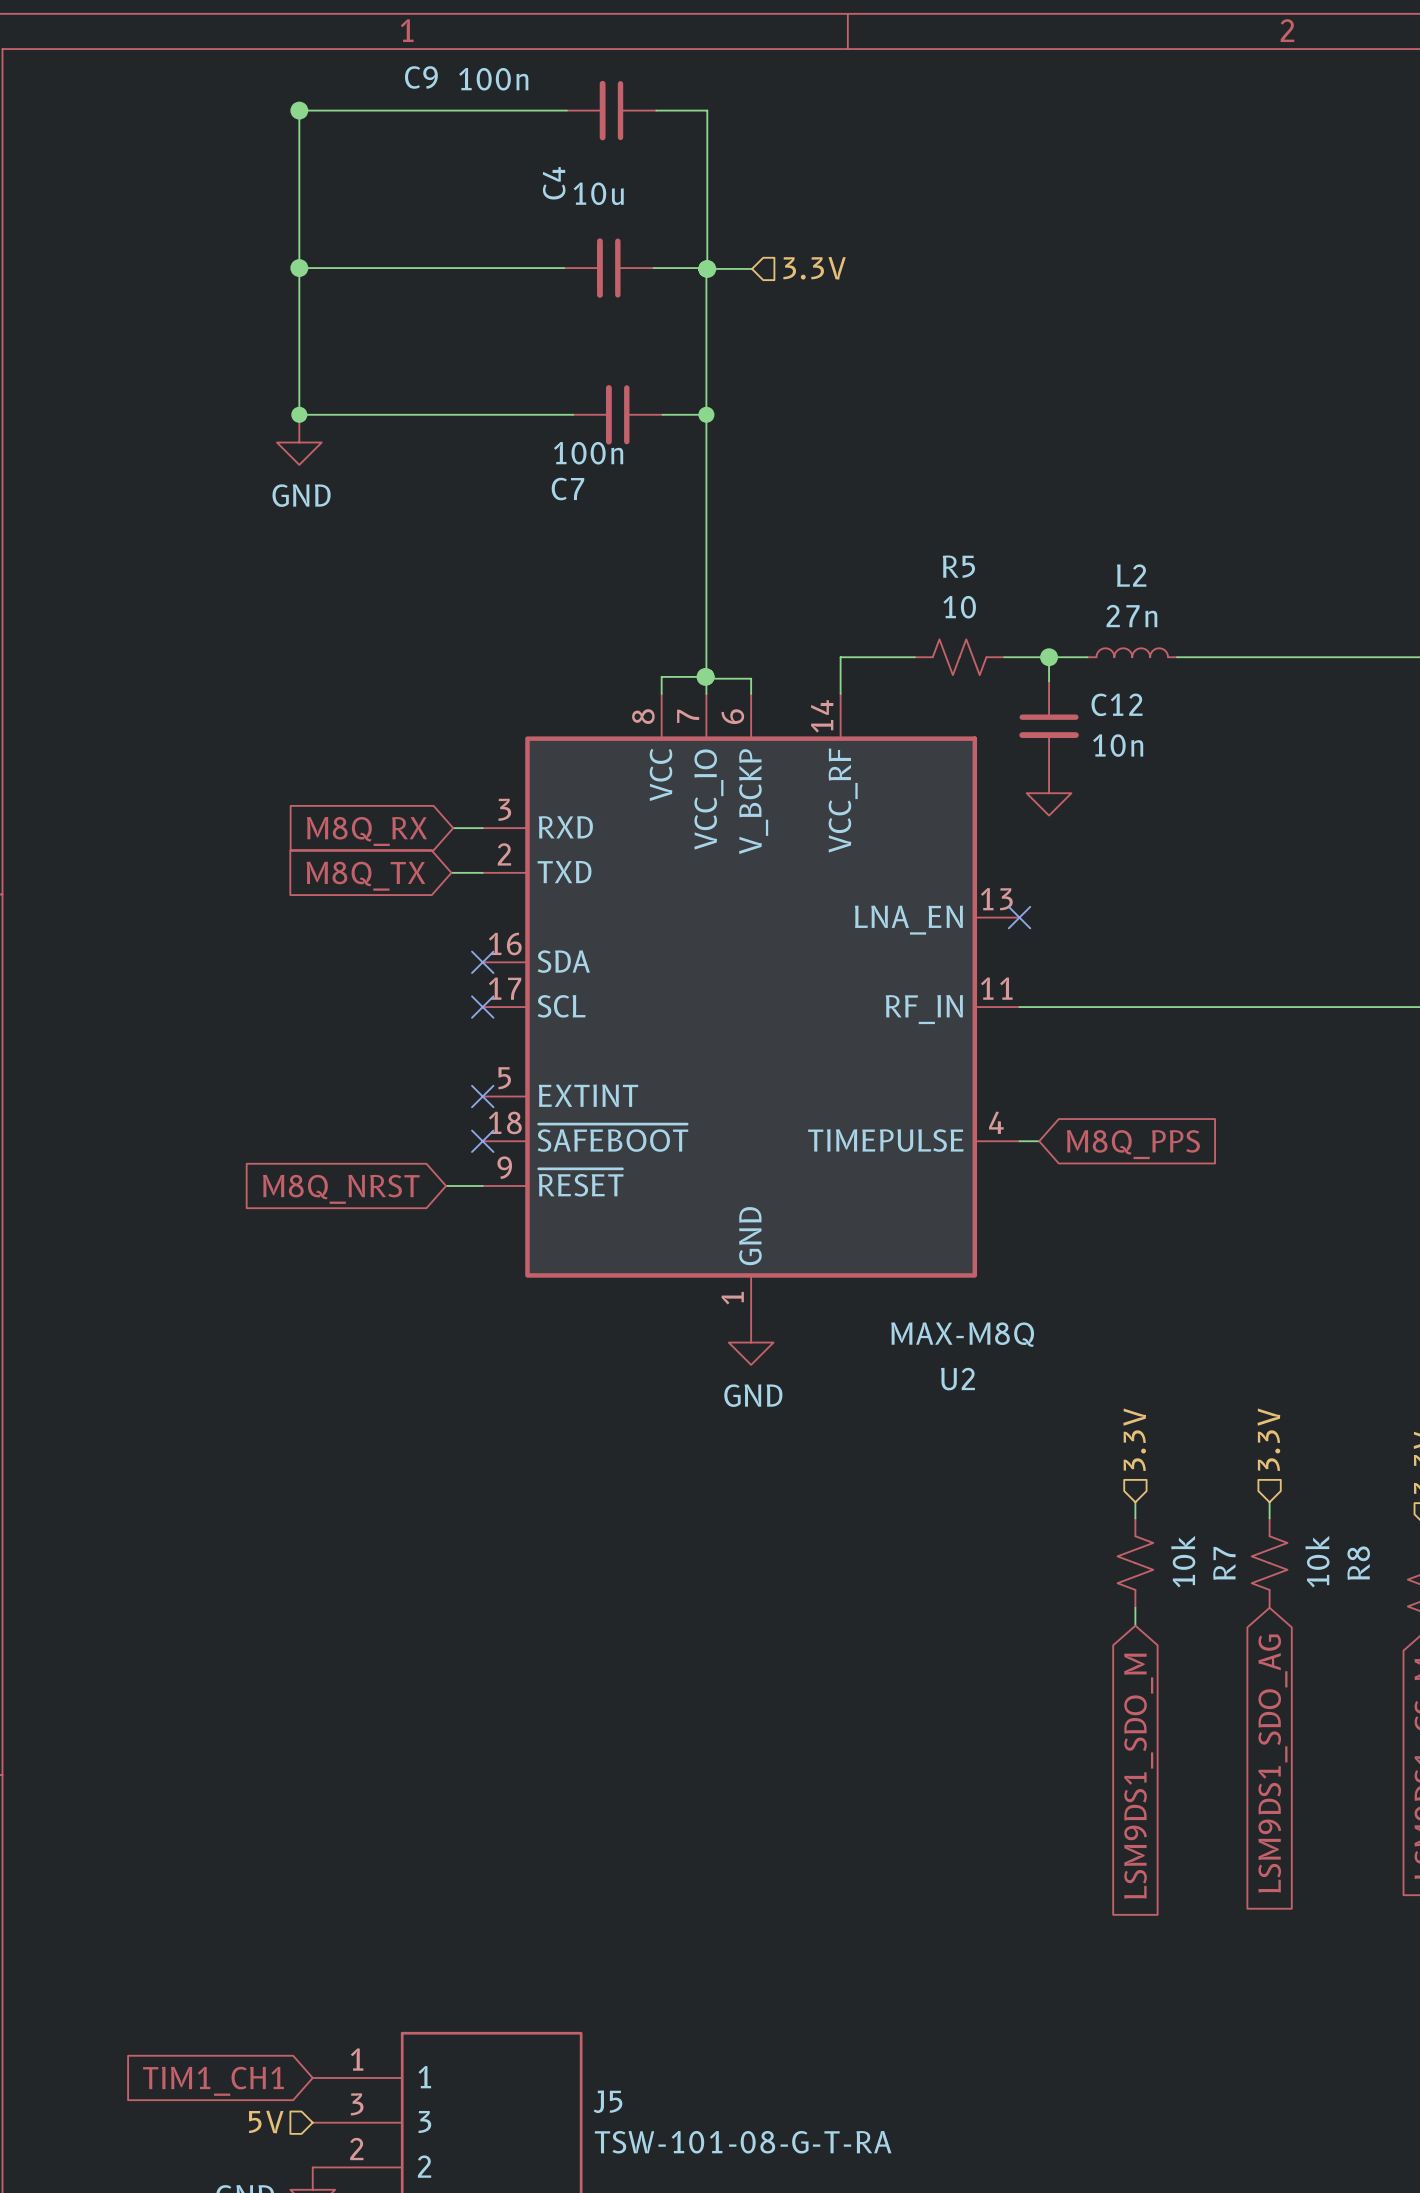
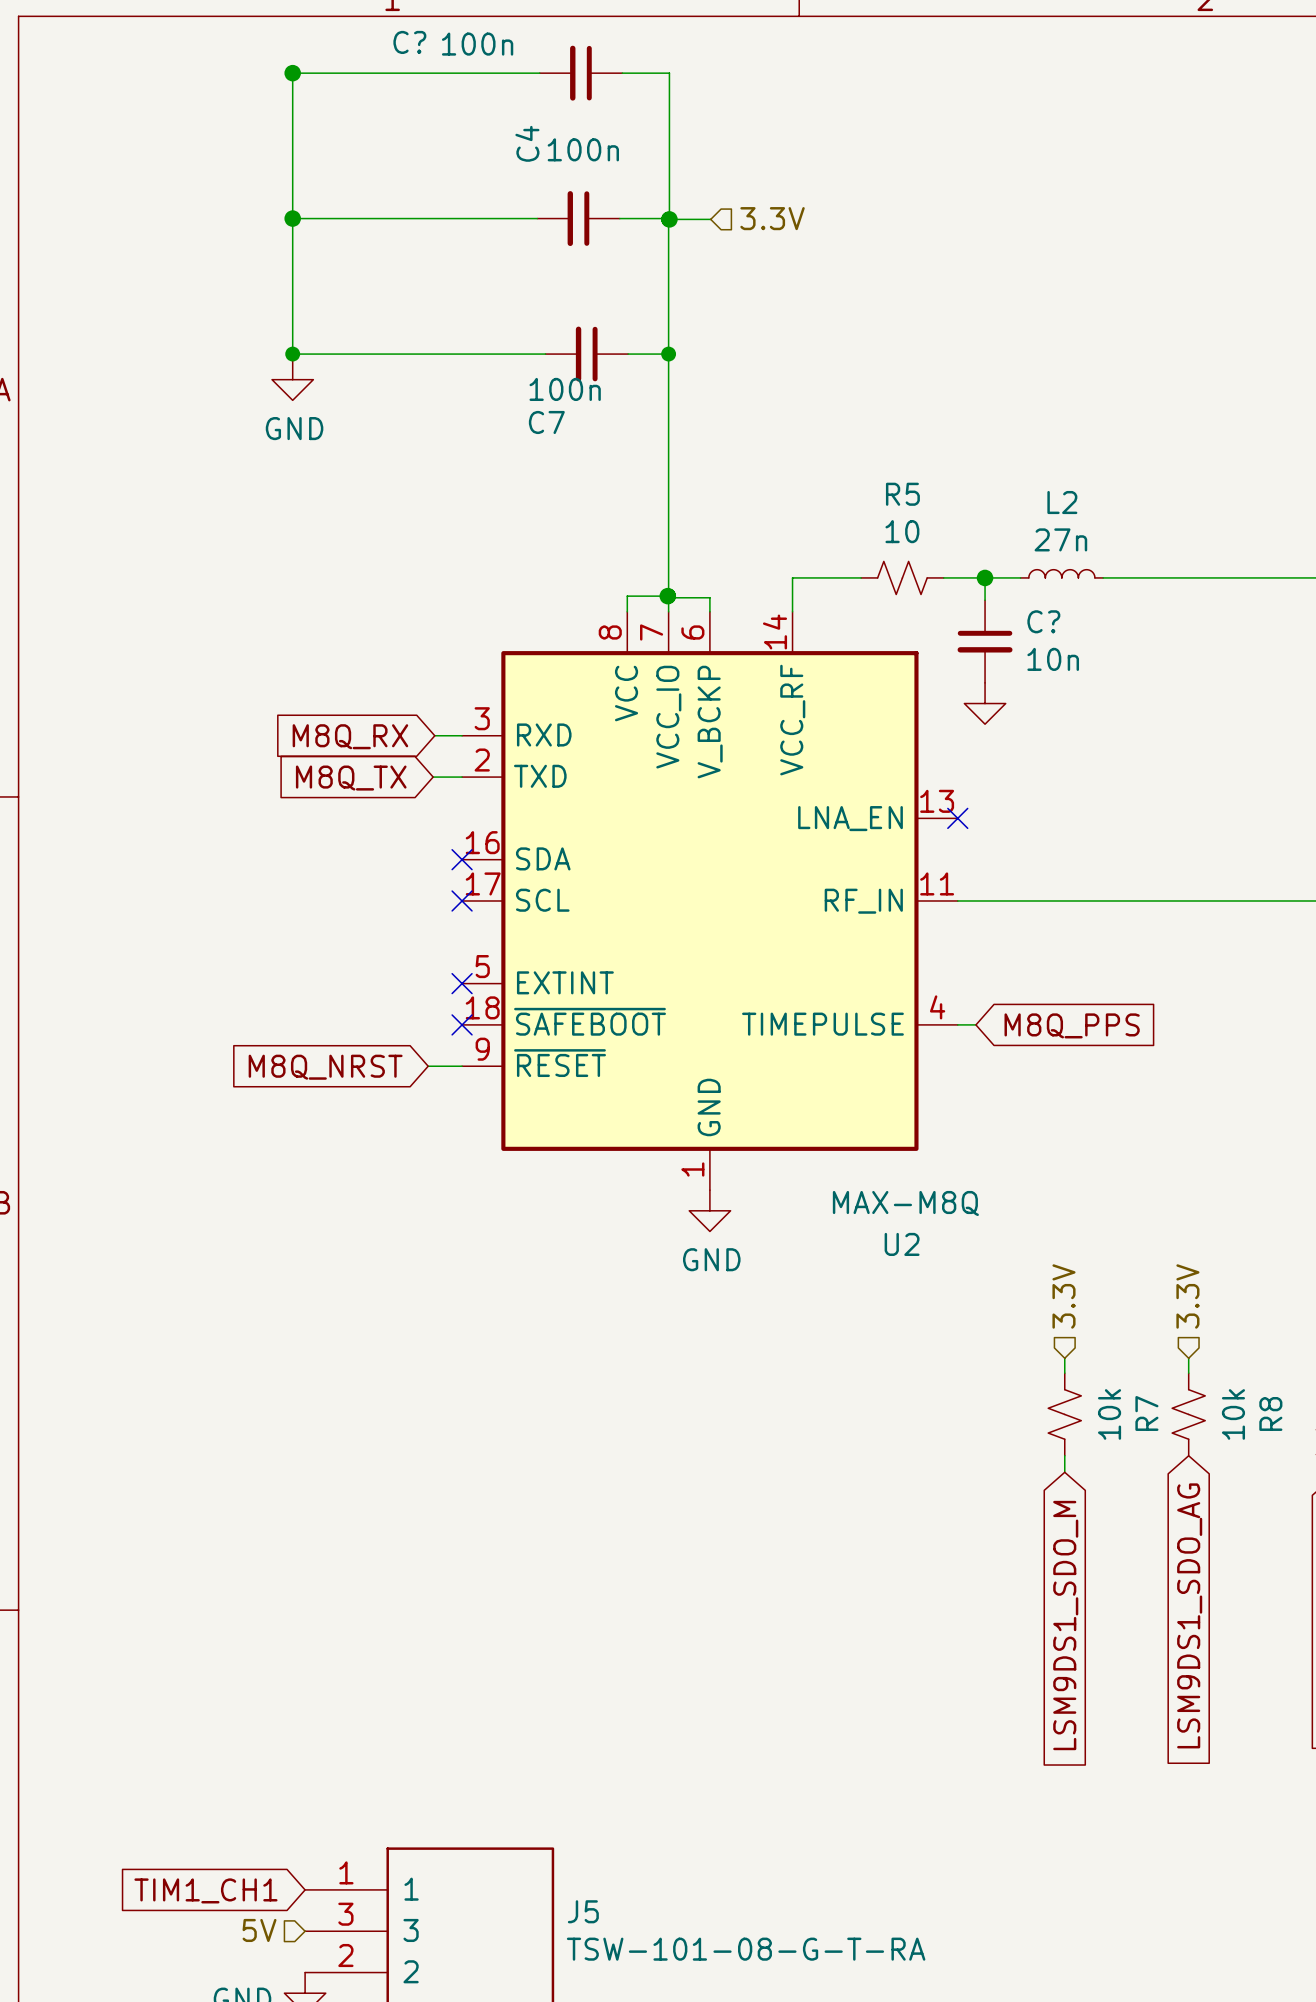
C9 name: C9 (421, 77) -> C? (409, 42)
C4 value: 10u (598, 193) -> 100n (583, 149)
C12 name: C12 (1117, 704) -> C? (1043, 621)

